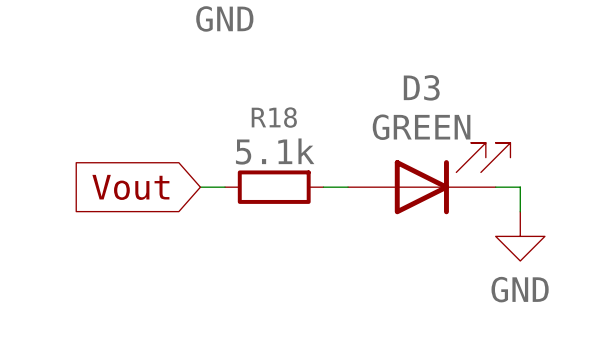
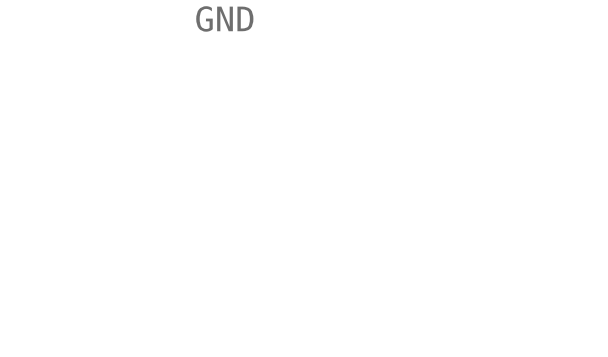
D3: GREEN (429, 178) -> none
global label: Vout (130, 187) -> none
wire: (200, 187) (225, 187) -> none
R18: 5.1k (274, 187) -> none
wire: (323, 187) (348, 187) -> none
wire: (495, 187) (520, 187) (520, 211) -> none
power symbol: GND (520, 236) -> none

